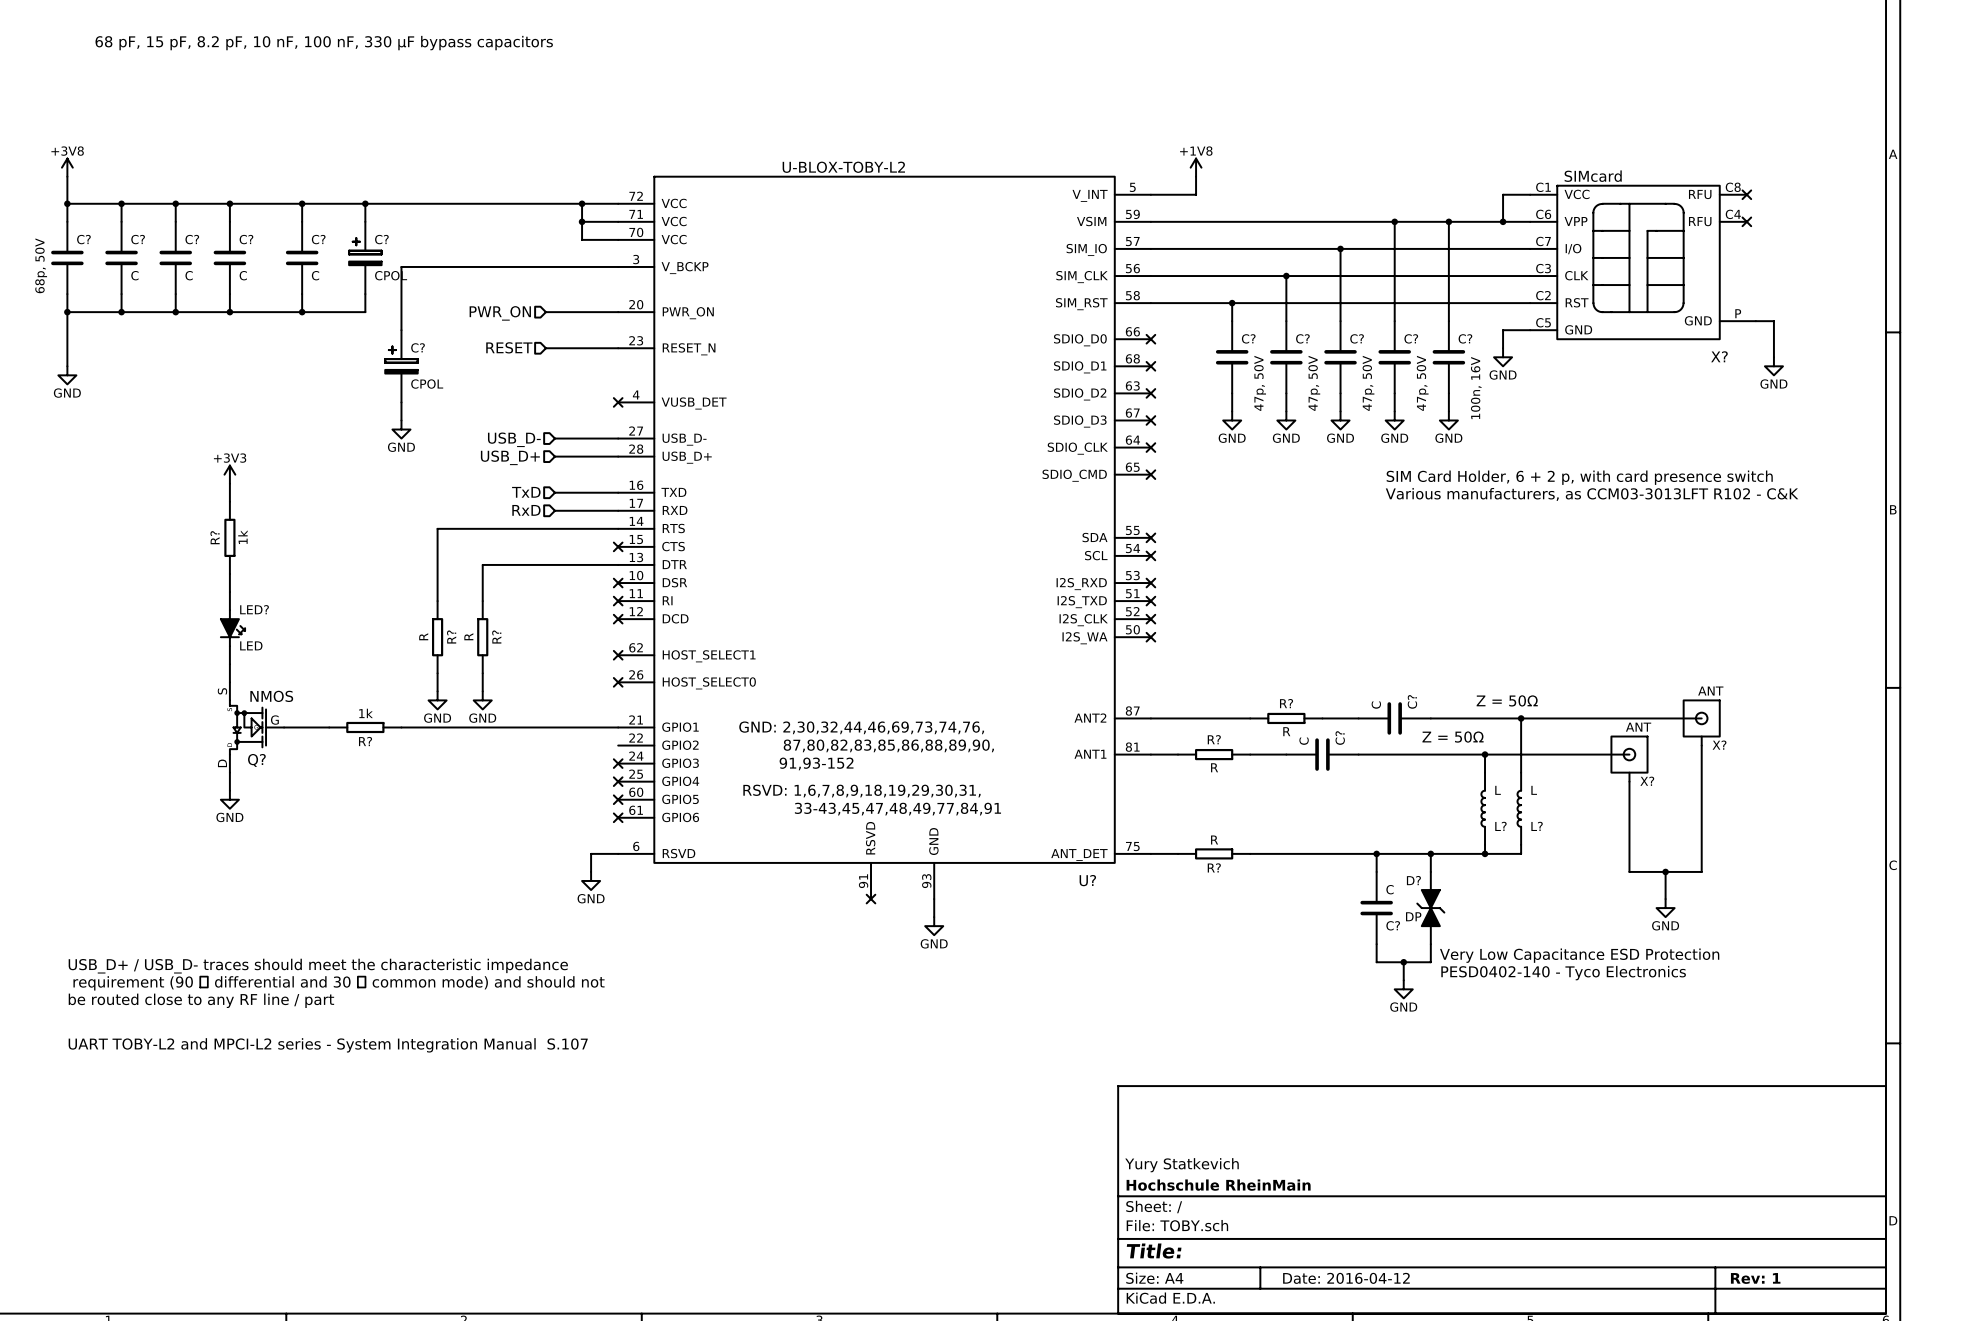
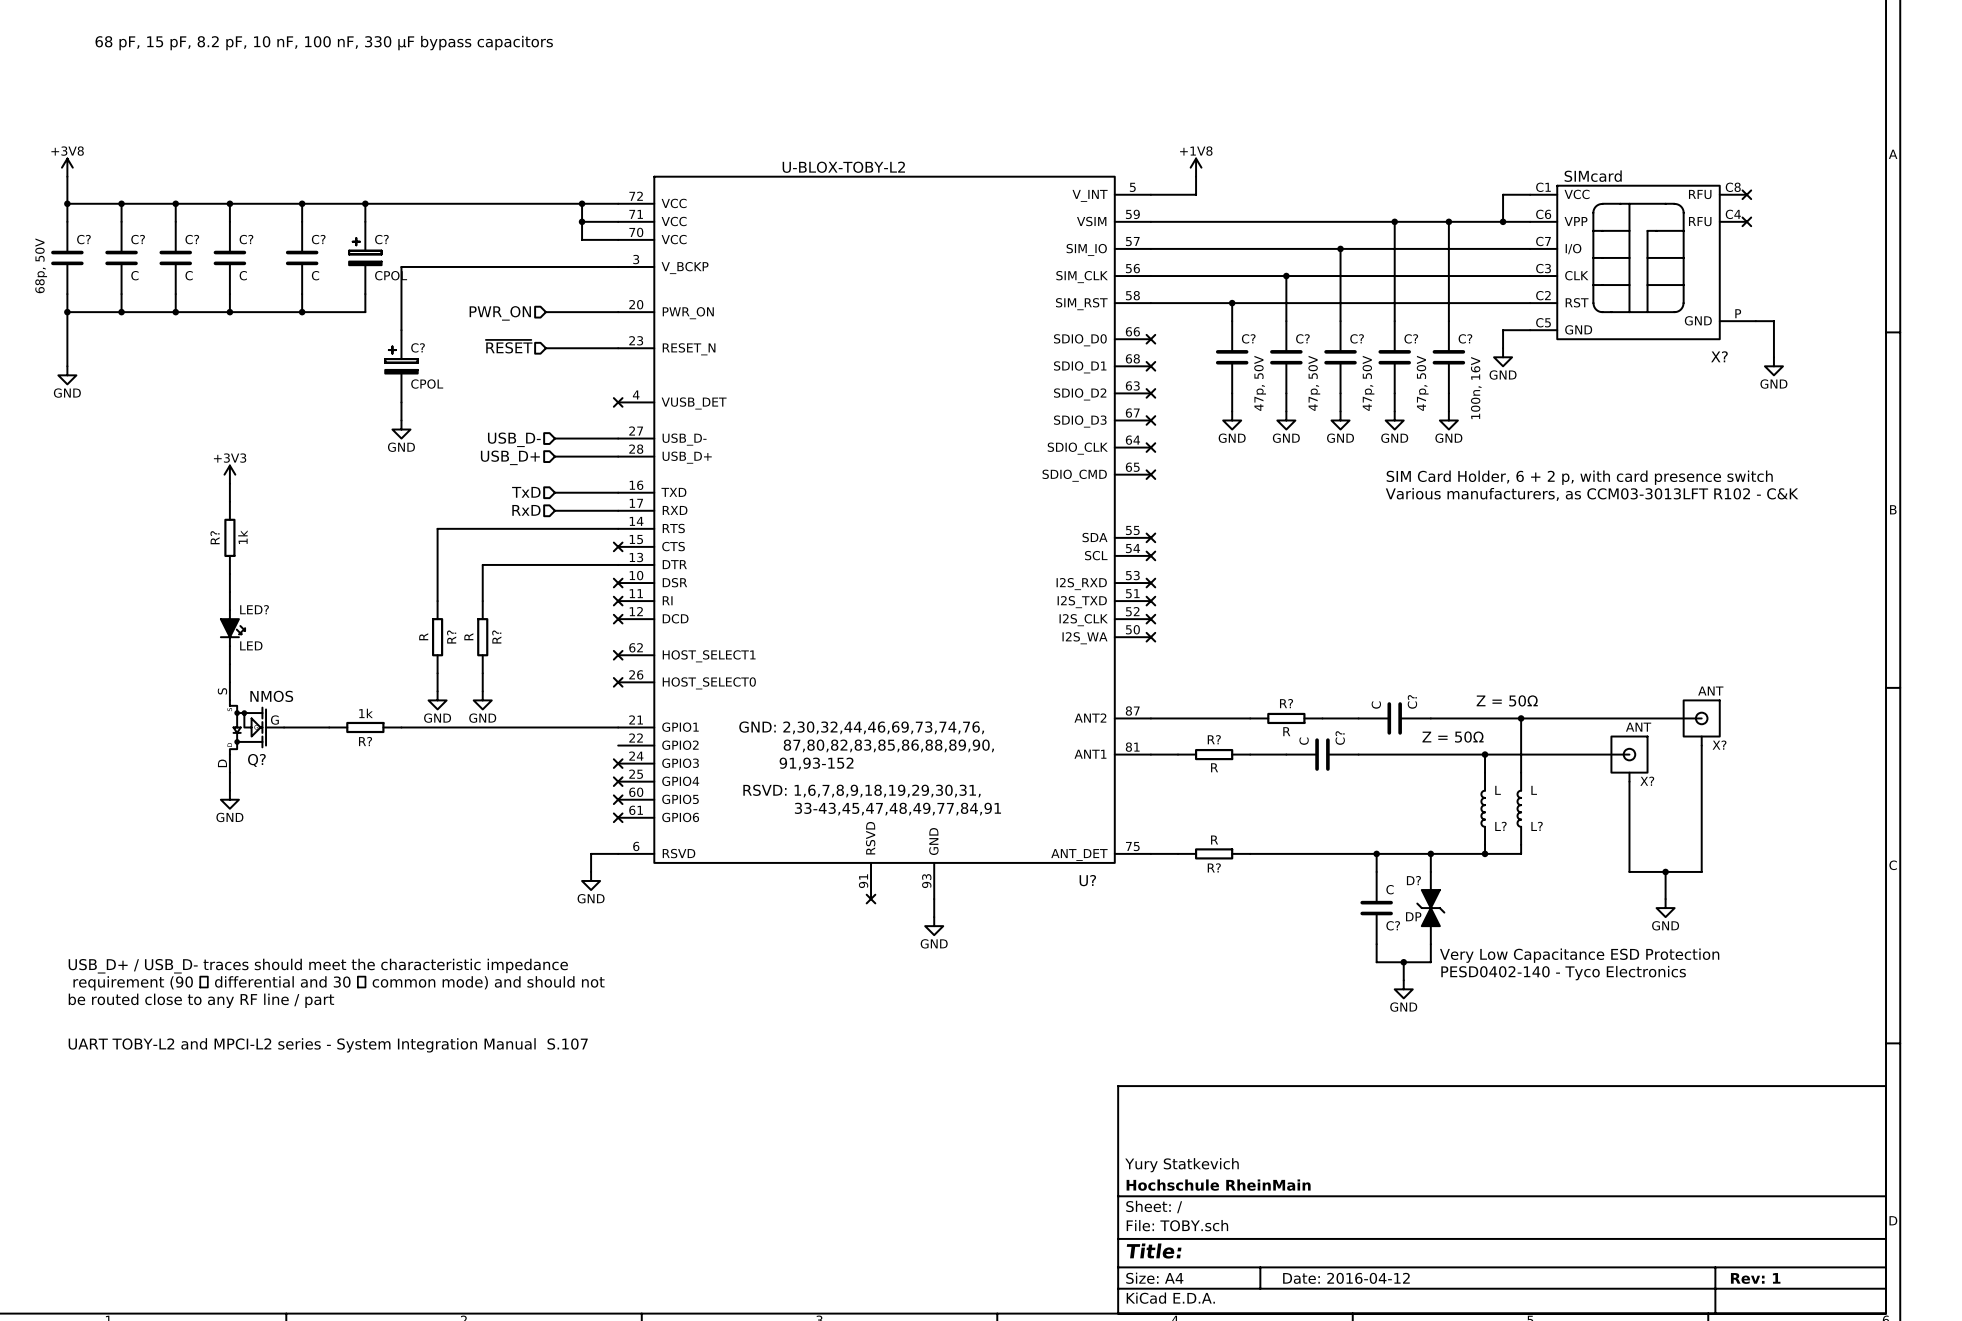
hierarchical label: RESET (509, 347) -> ~{RESET} (509, 346)

